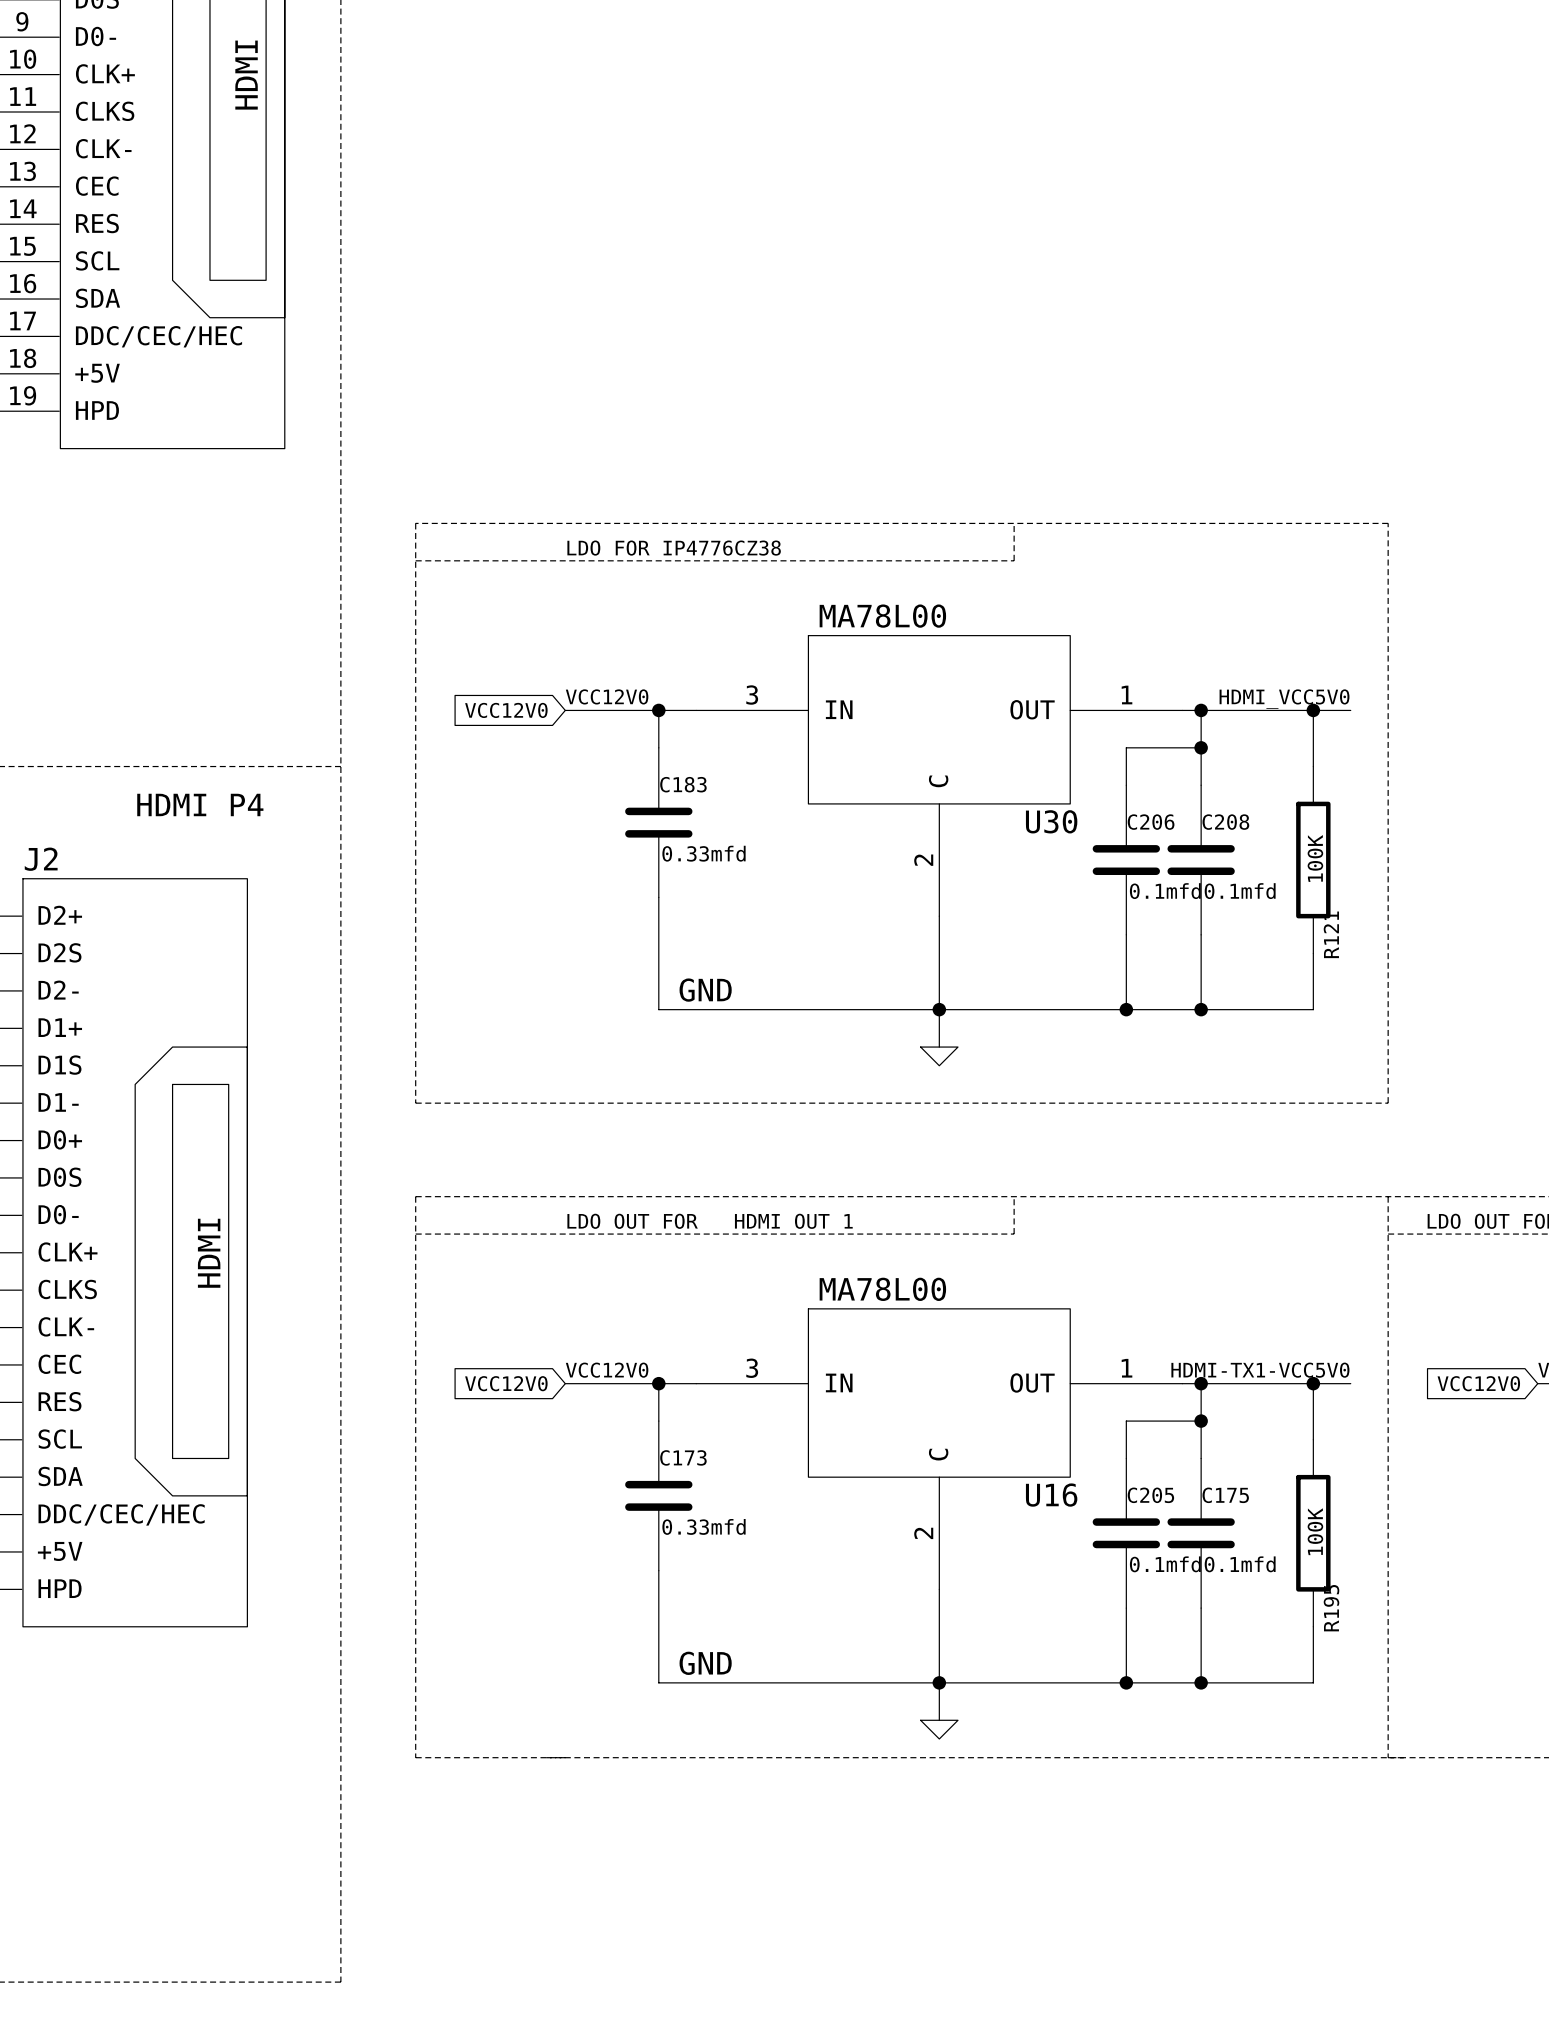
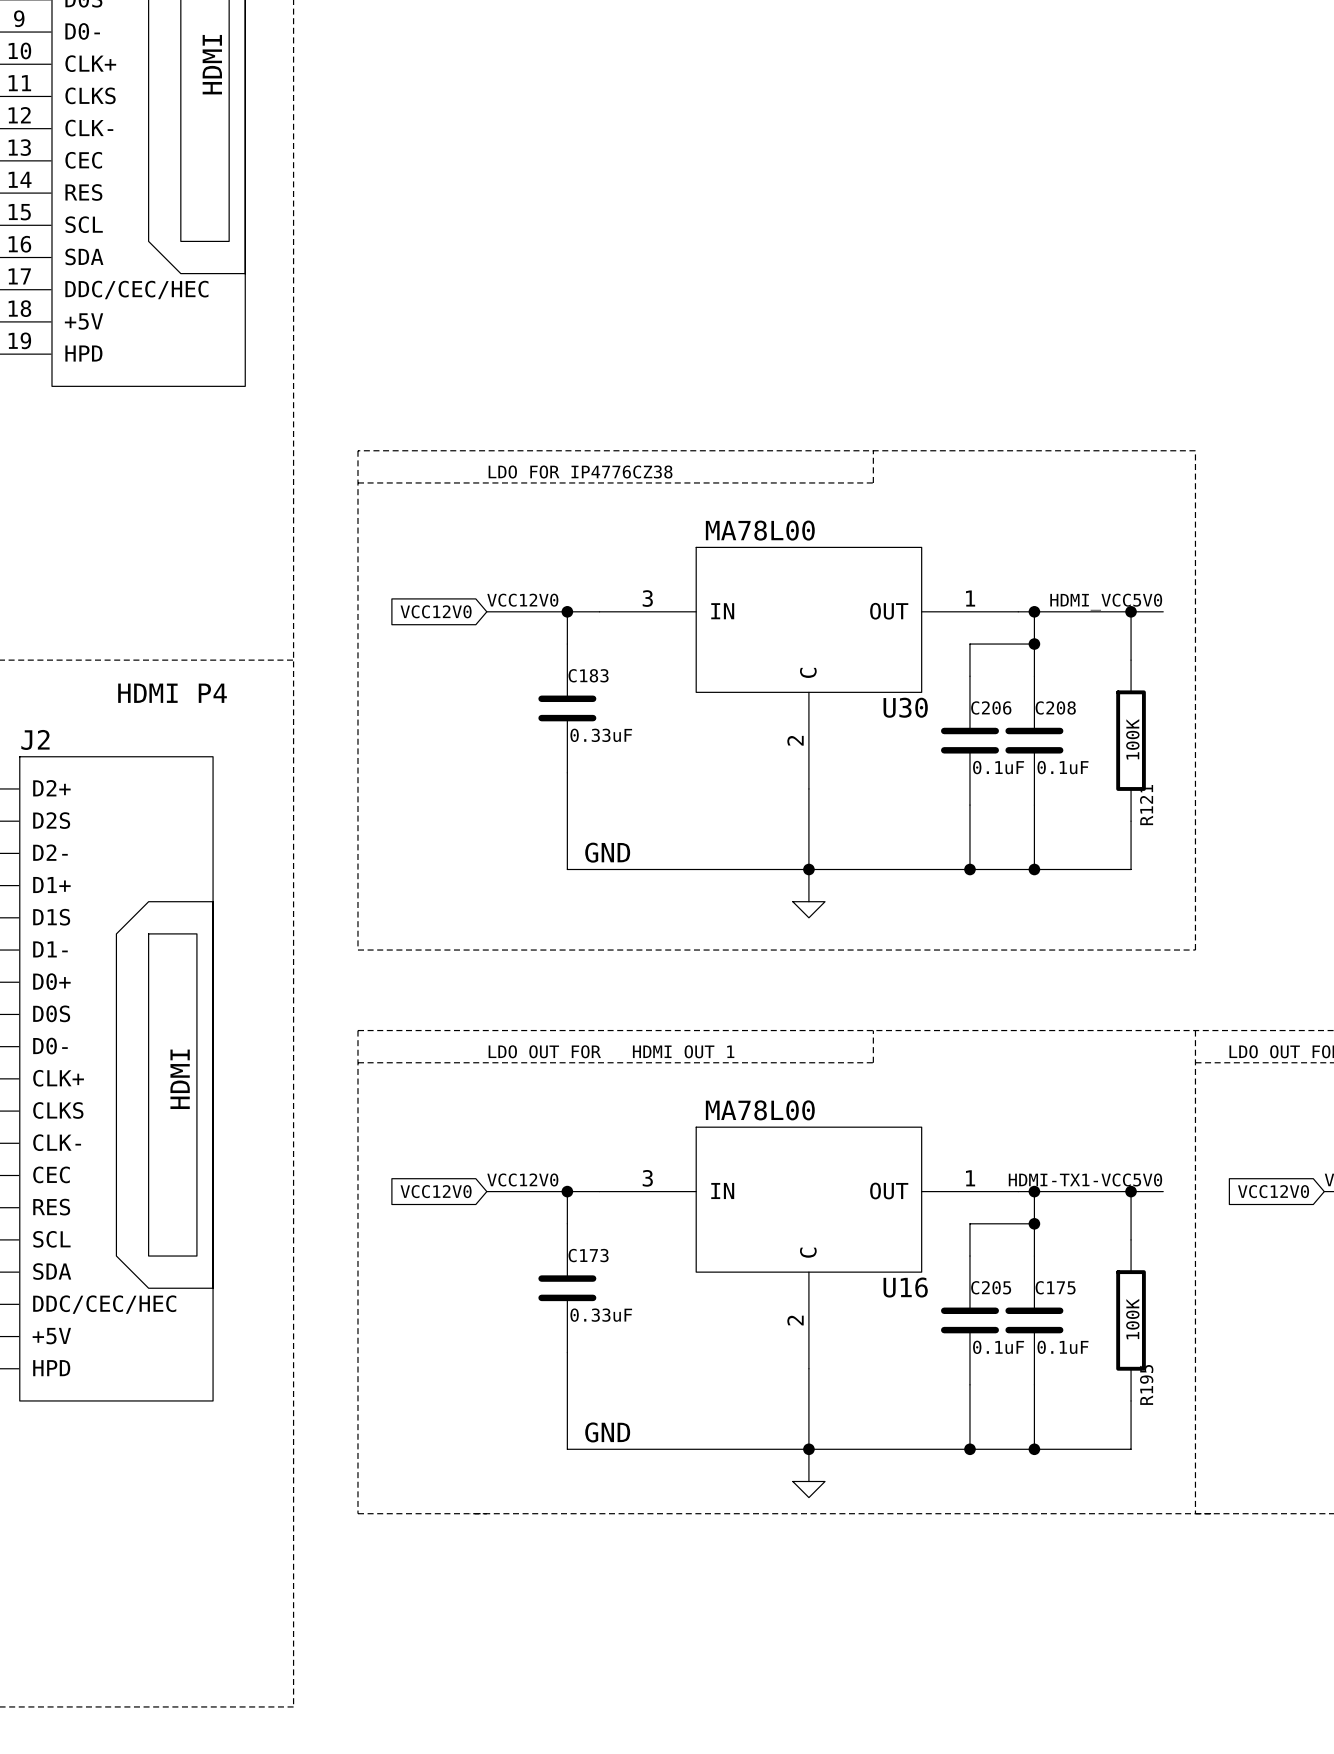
C183 value: 0.33mfd (704, 853) -> 0.33uF (601, 735)
C206 value: 0.1mfd (1165, 891) -> 0.1uF (998, 767)
C208 value: 0.1mfd (1240, 891) -> 0.1uF (1062, 767)
C173 value: 0.33mfd (704, 1526) -> 0.33uF (601, 1315)
C205 value: 0.1mfd (1165, 1564) -> 0.1uF (998, 1347)
C175 value: 0.1mfd (1240, 1564) -> 0.1uF (1062, 1347)

